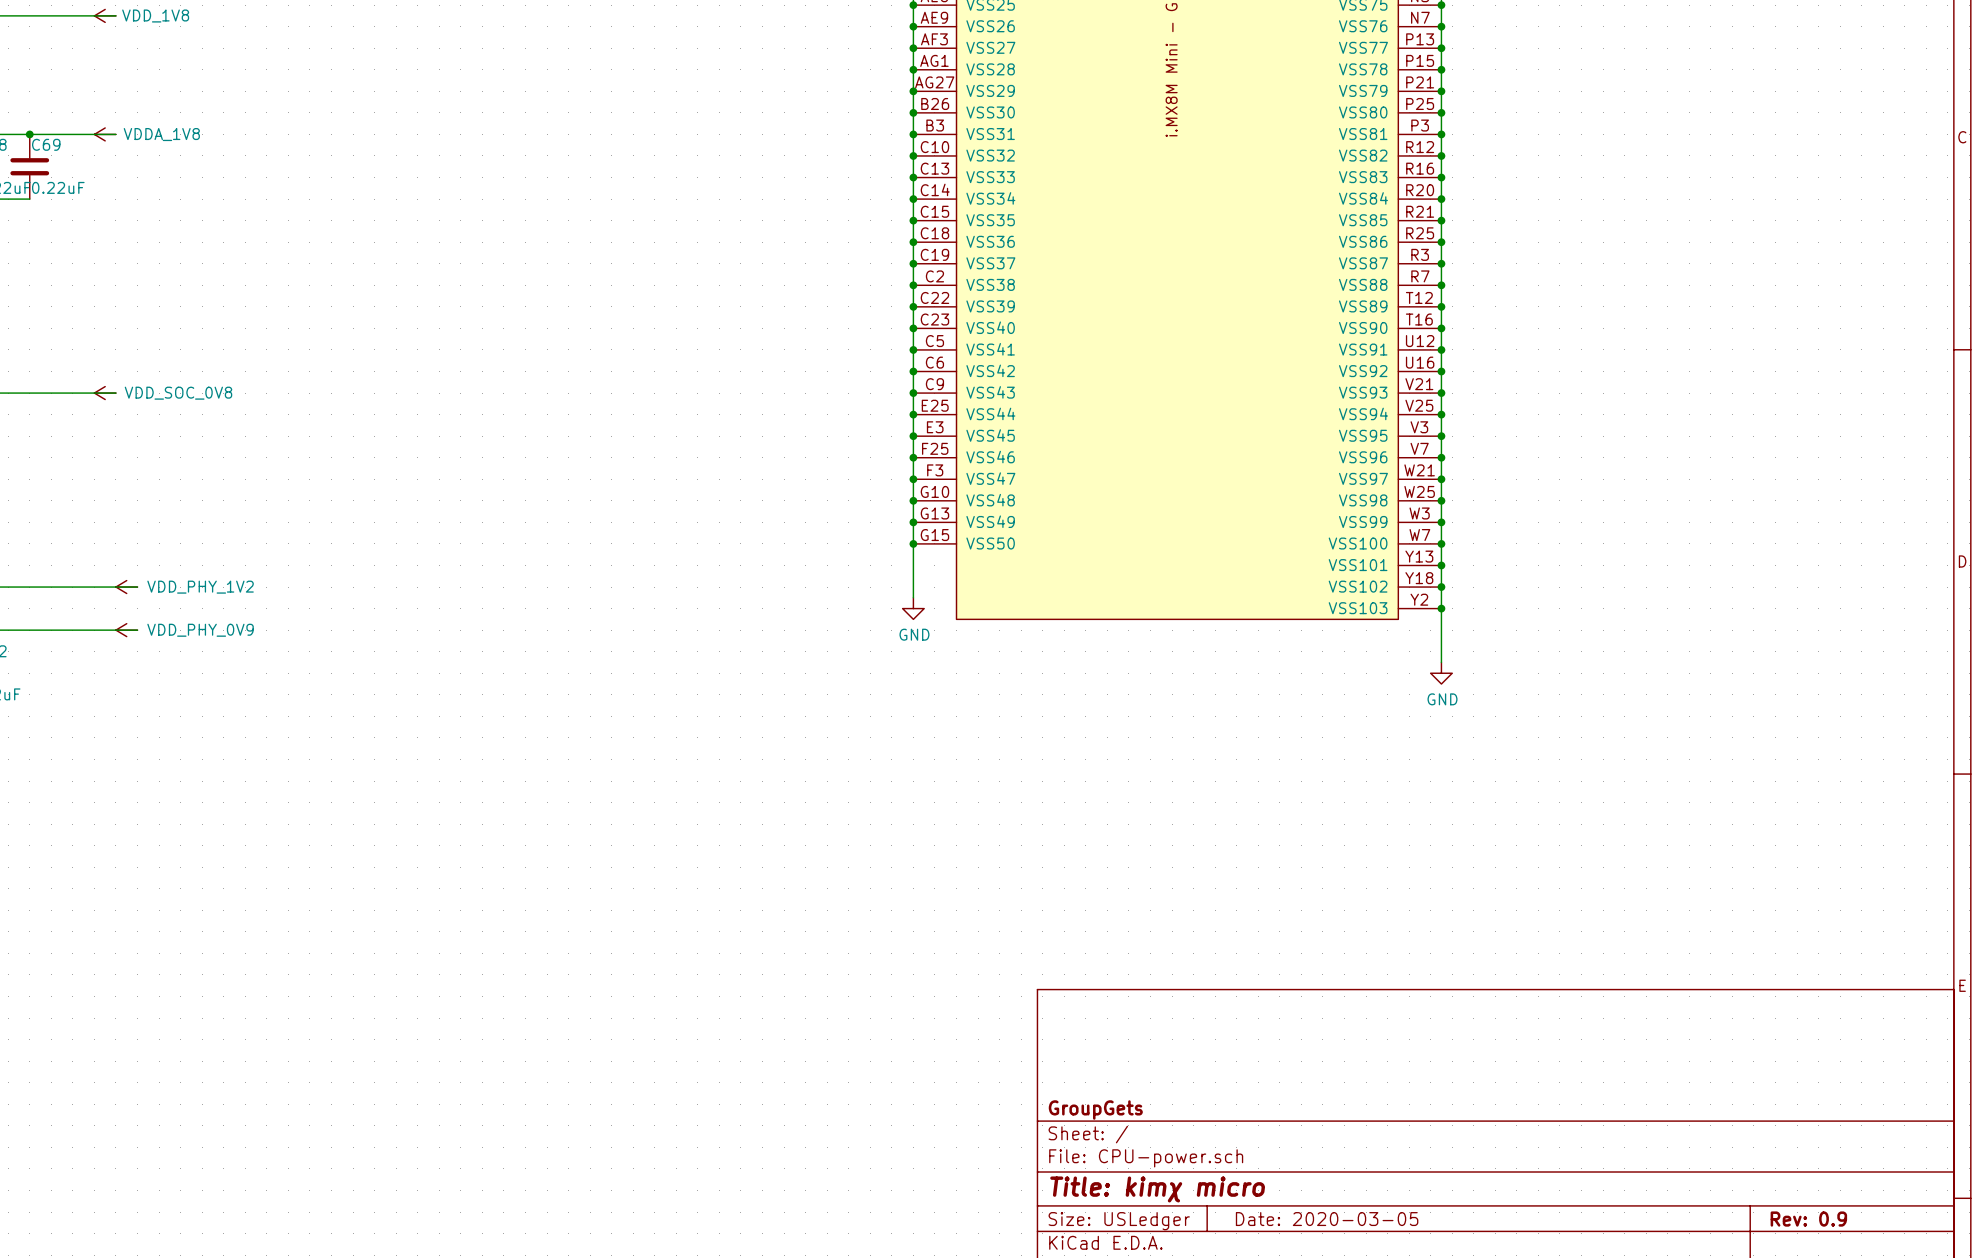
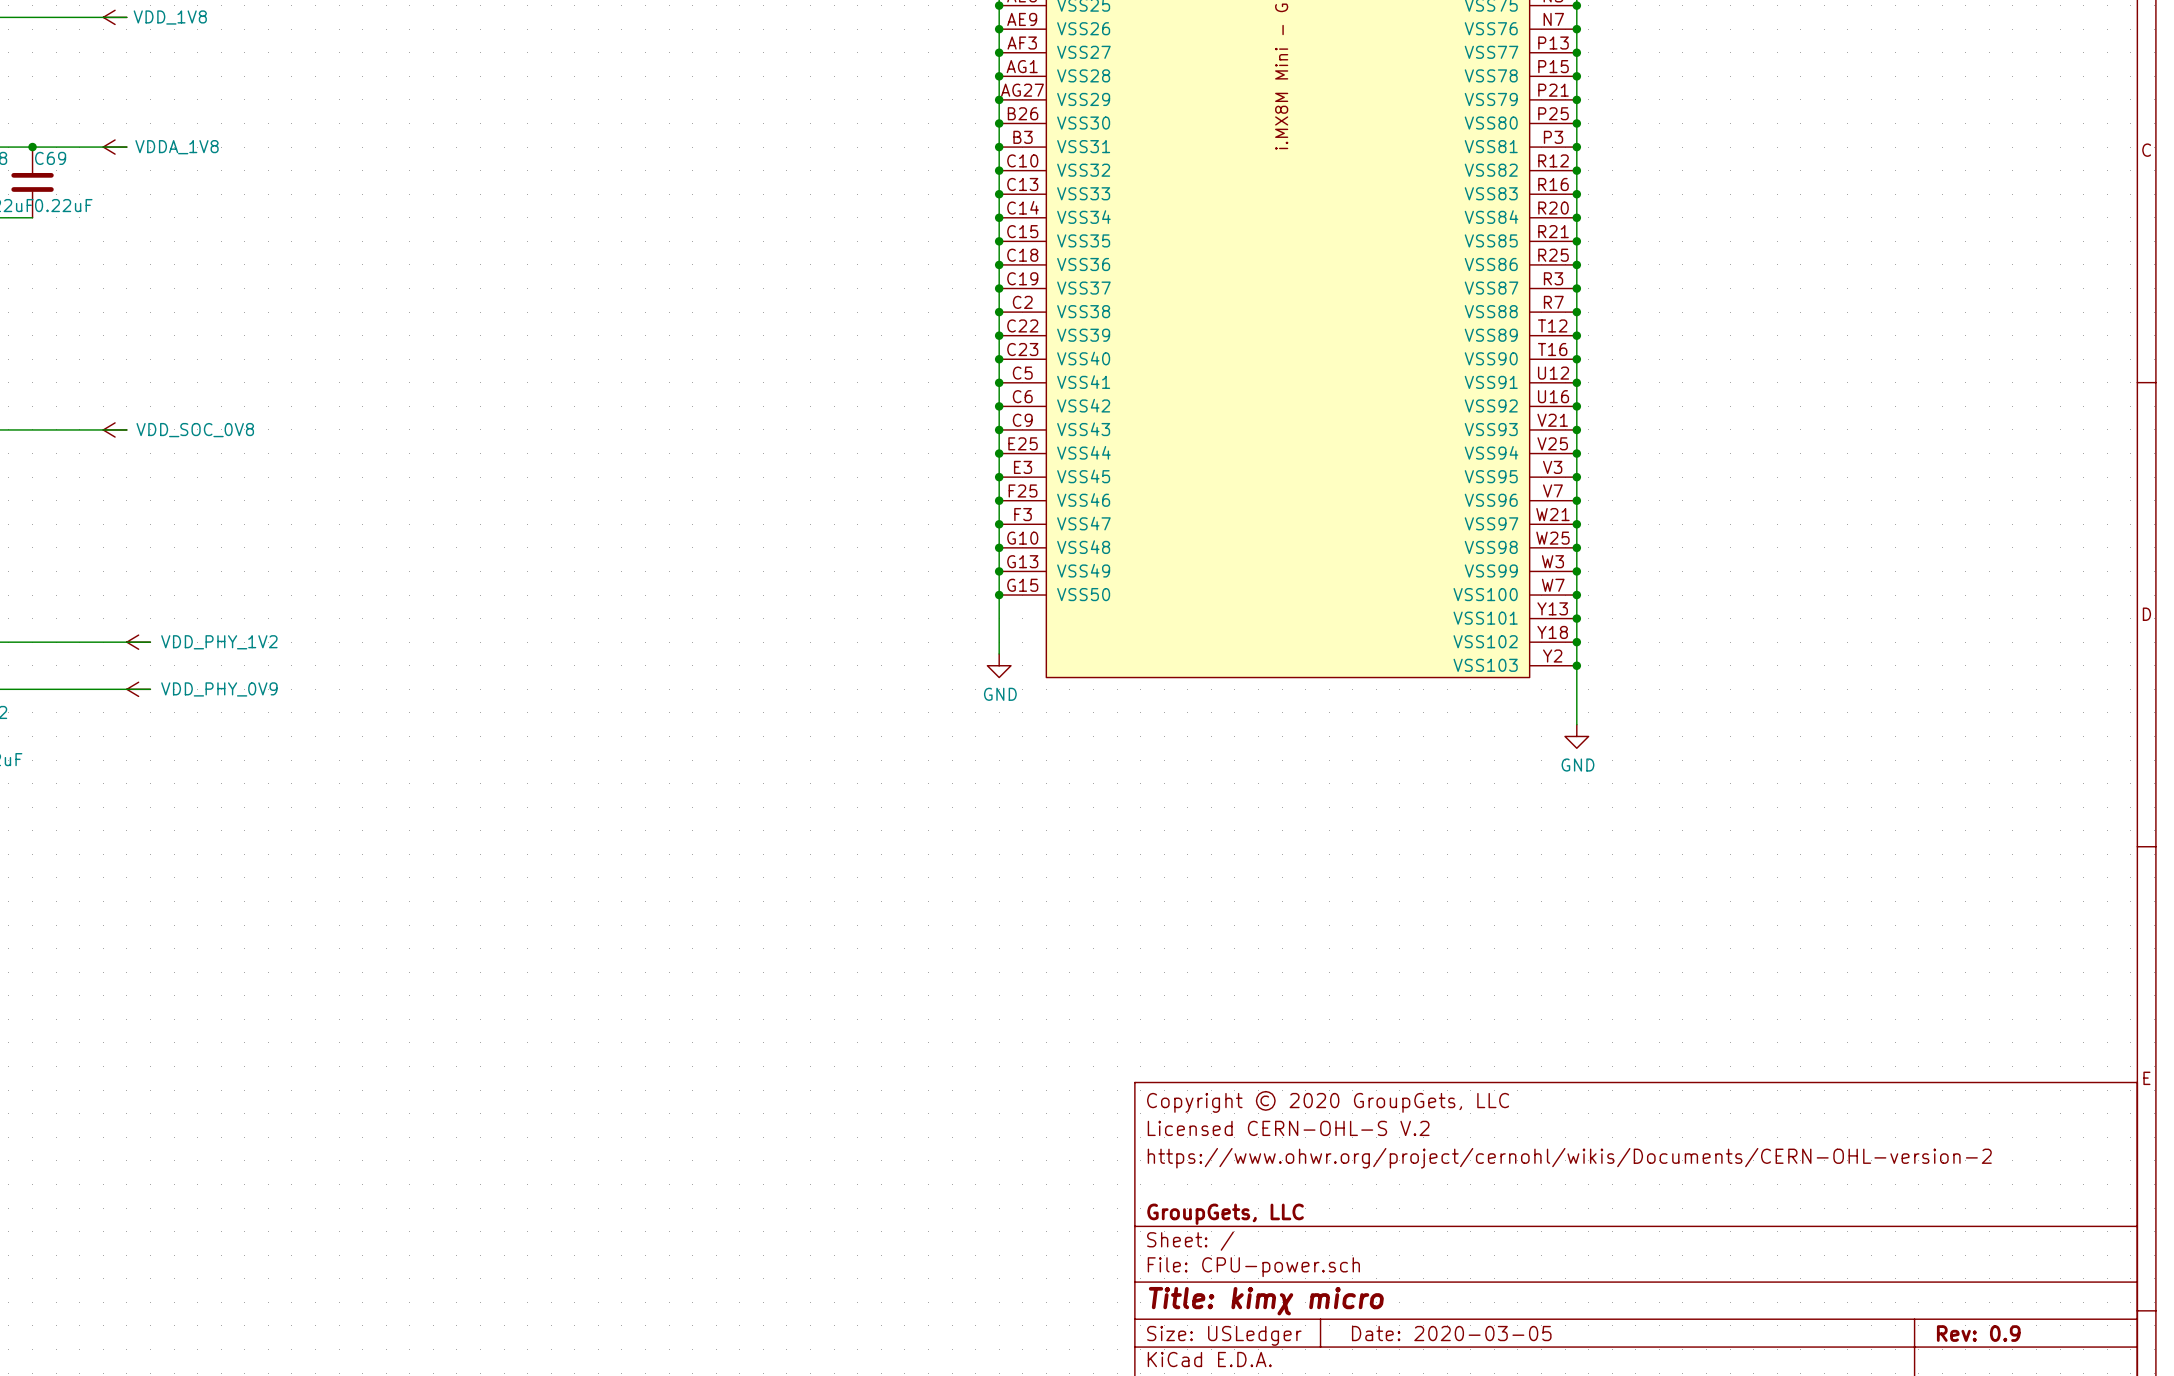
title block: none -> Copyright © 2020 GroupGets, LLC (1328, 1101)
title block: none -> Licensed CERN-OHL-S V.2 (1288, 1128)
title block: none -> https://www.ohwr.org/project/cernohl/wikis/Documents/CERN-OHL-version-2 (1569, 1158)
title block: GroupGets (1095, 1110) -> GroupGets, LLC (1225, 1214)

